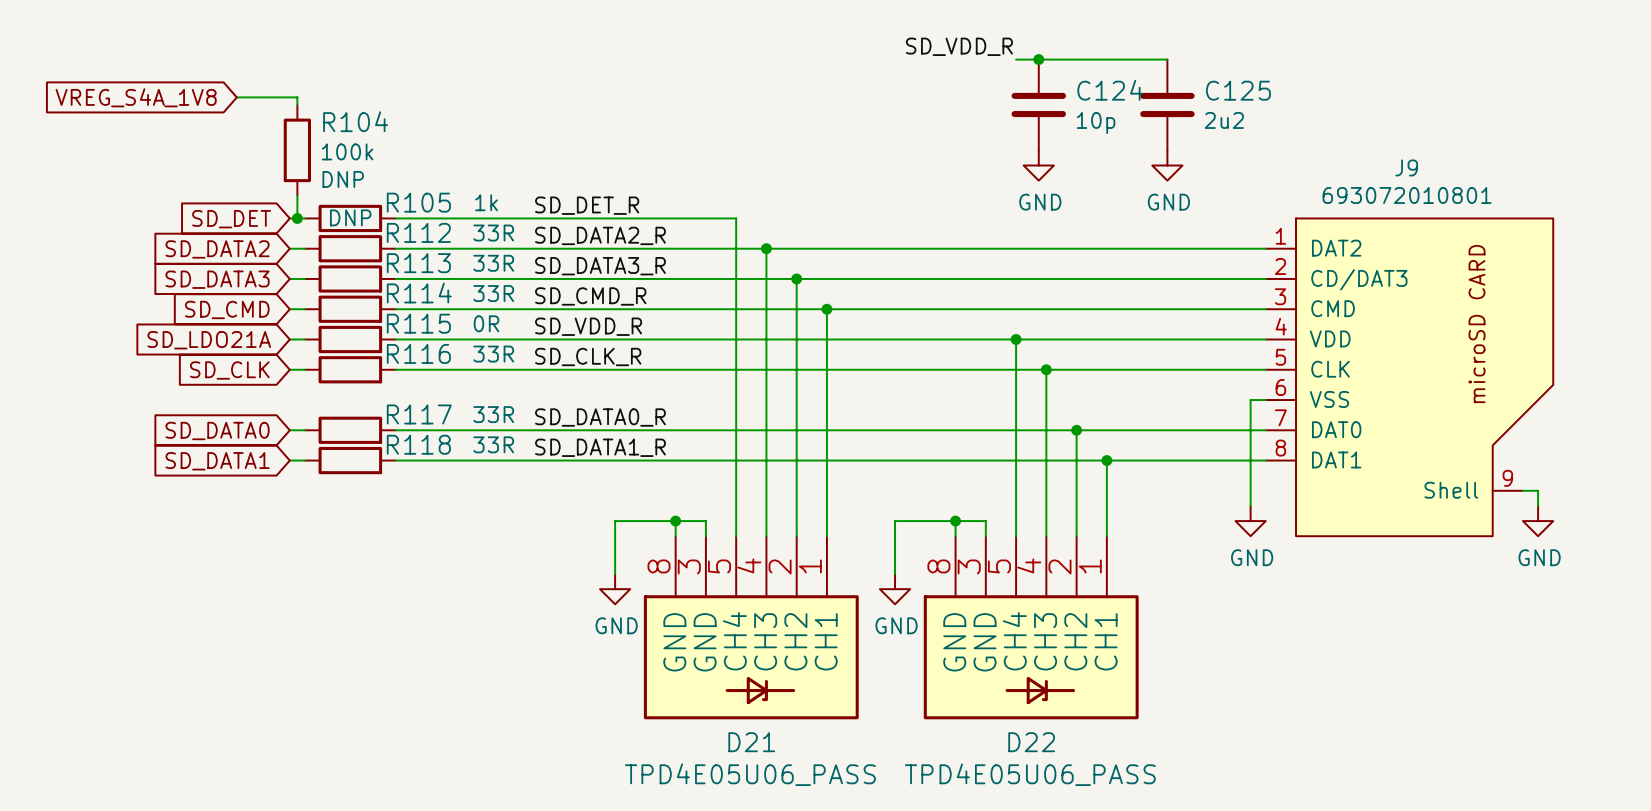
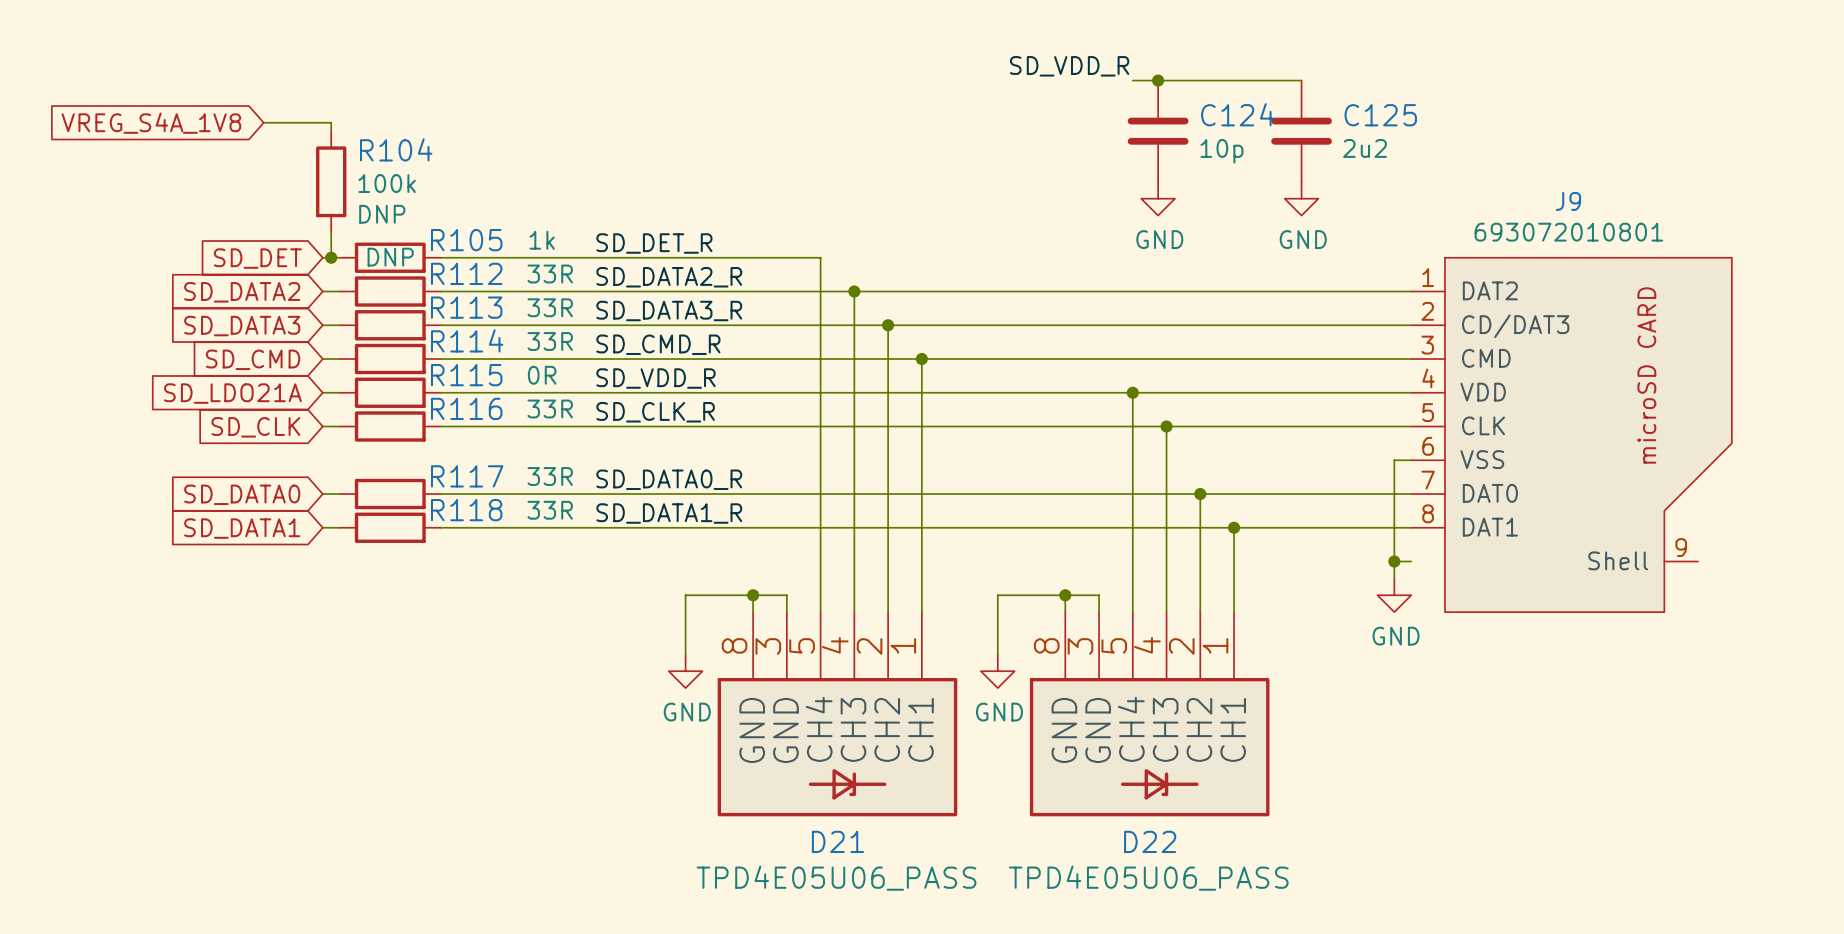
wire: none -> (1394, 561) (1411, 561)
junction: none -> (1394, 561)
wire: (1522, 490) (1538, 490) (1538, 505) -> none
power symbol: GND (1538, 521) -> none

